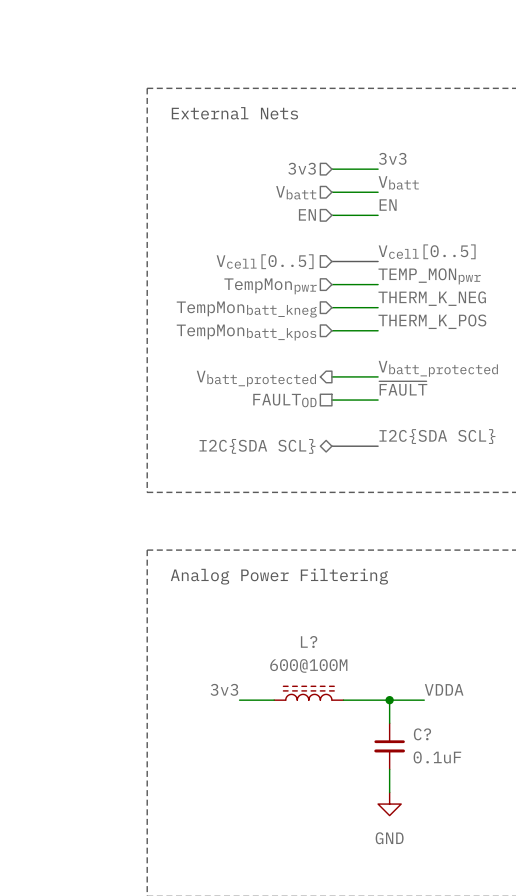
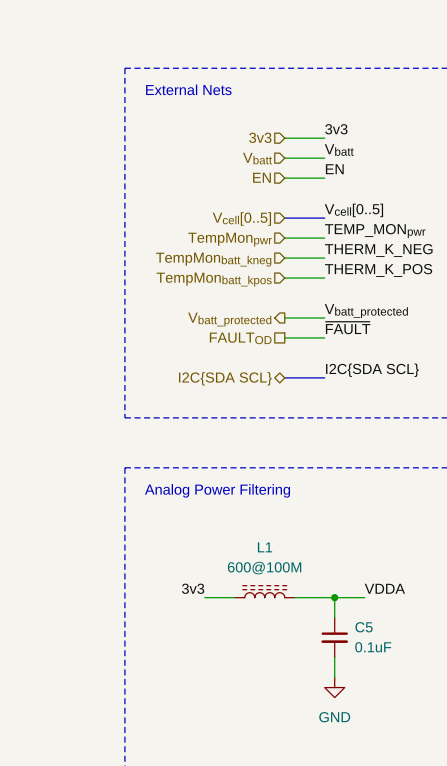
L? name: L? (309, 641) -> L1 (265, 547)
C? name: C? (422, 734) -> C5 (364, 627)

